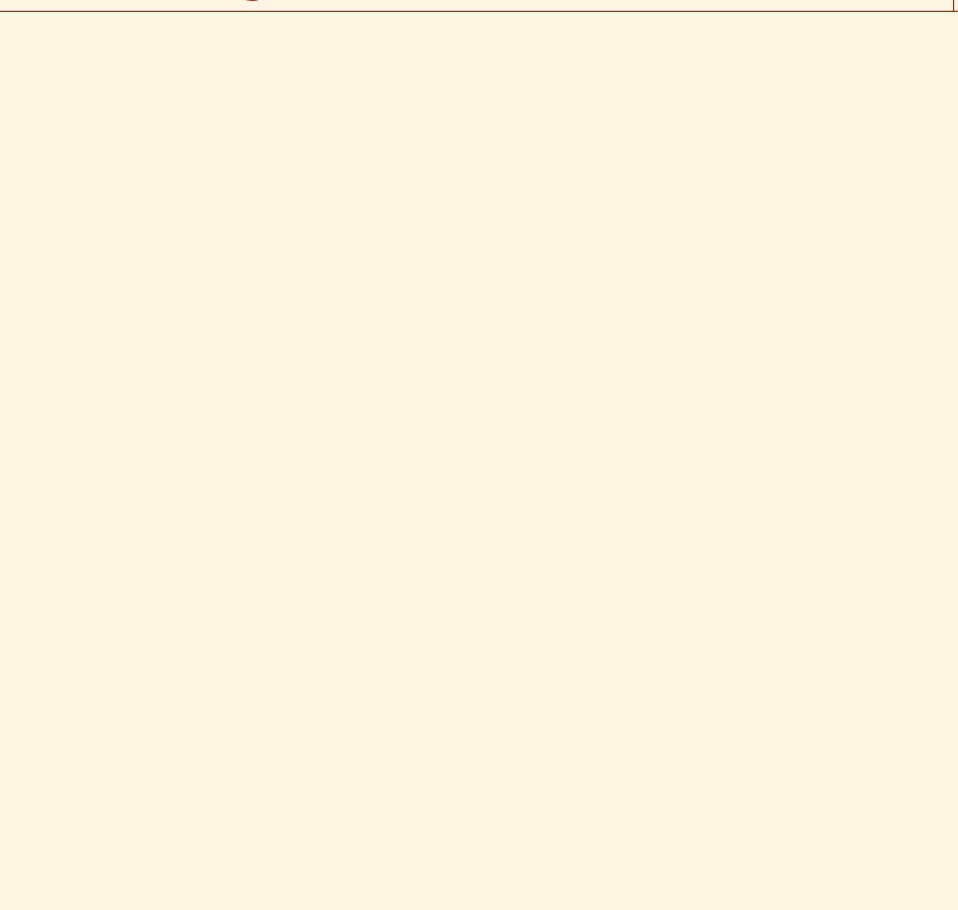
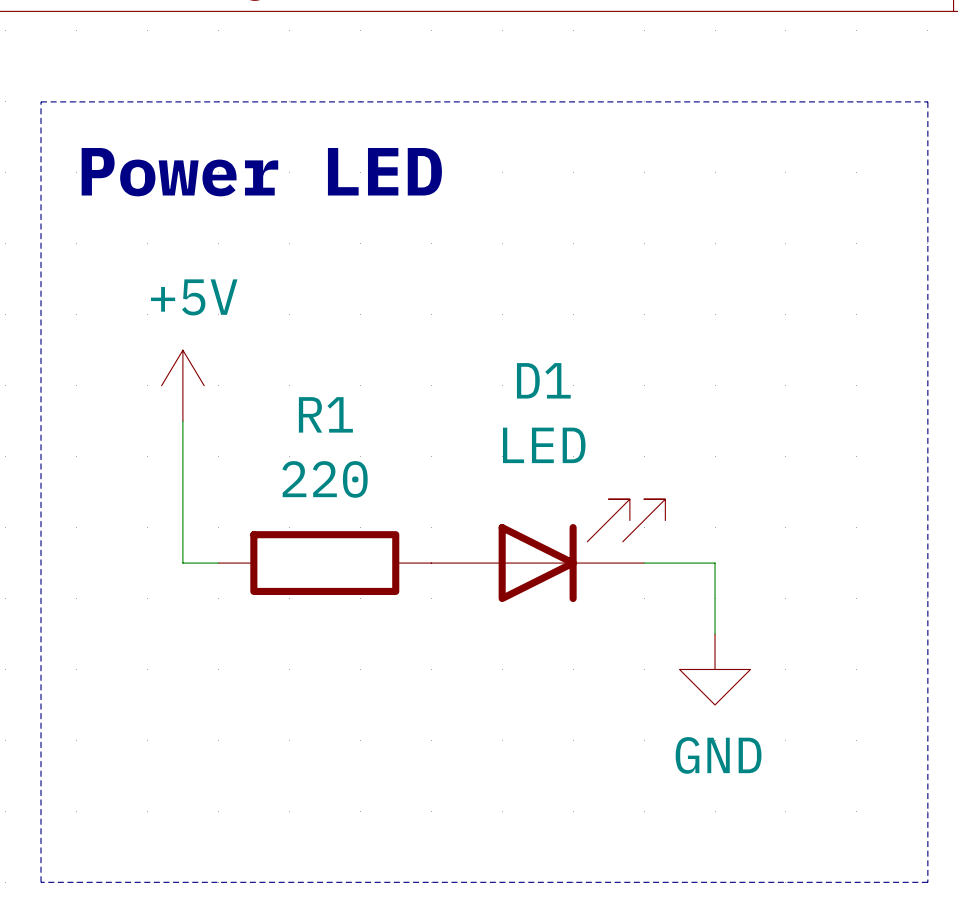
line: none -> (41, 101) (927, 101) (927, 882) (41, 882) (41, 101)
text: none -> Power LED (261, 172)
power symbol: none -> +5V (182, 385)
wire: none -> (182, 421) (182, 563) (218, 563)
D1: none -> LED (548, 550)
R1: none -> 220 (324, 563)
wire: none -> (644, 563) (715, 563) (715, 634)
power symbol: none -> GND (715, 669)

